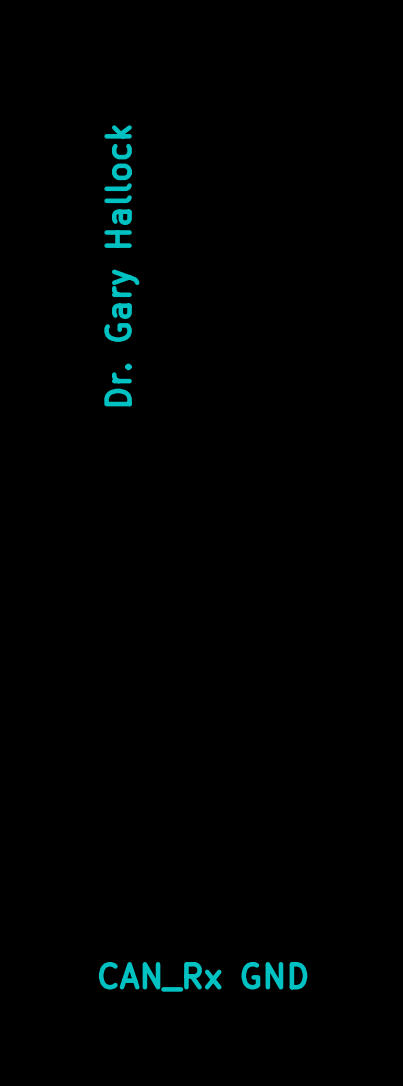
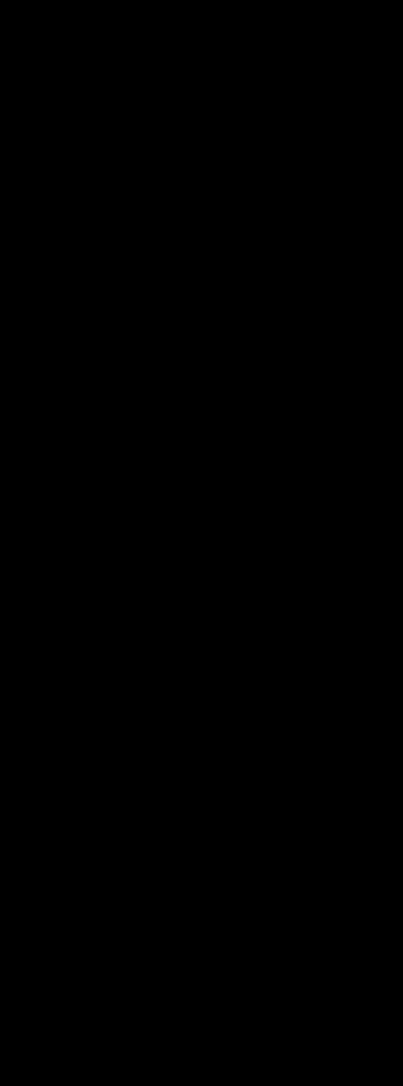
text: Dr. Gary Hallock (121, 265) -> none
text: GND (274, 975) -> none
text: CAN_Rx (160, 976) -> none

